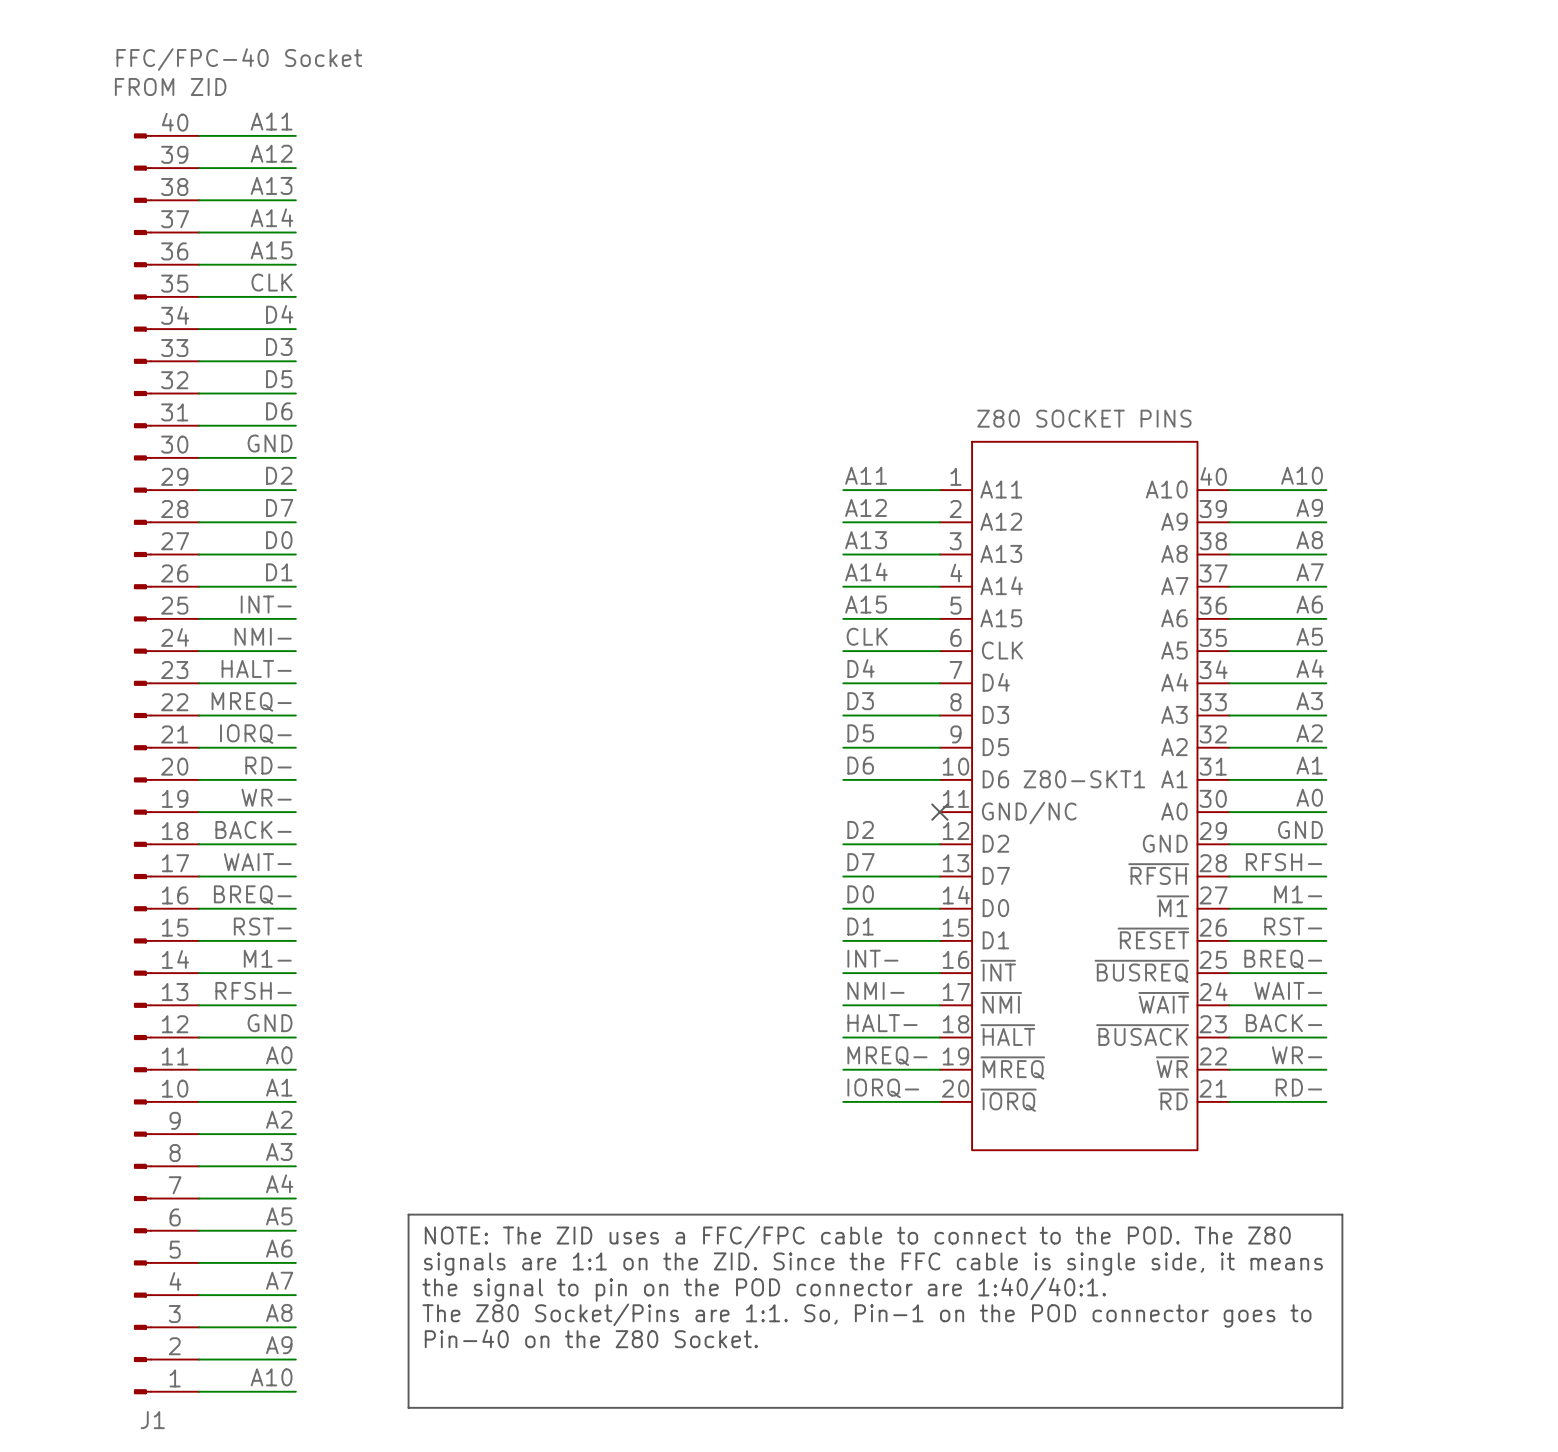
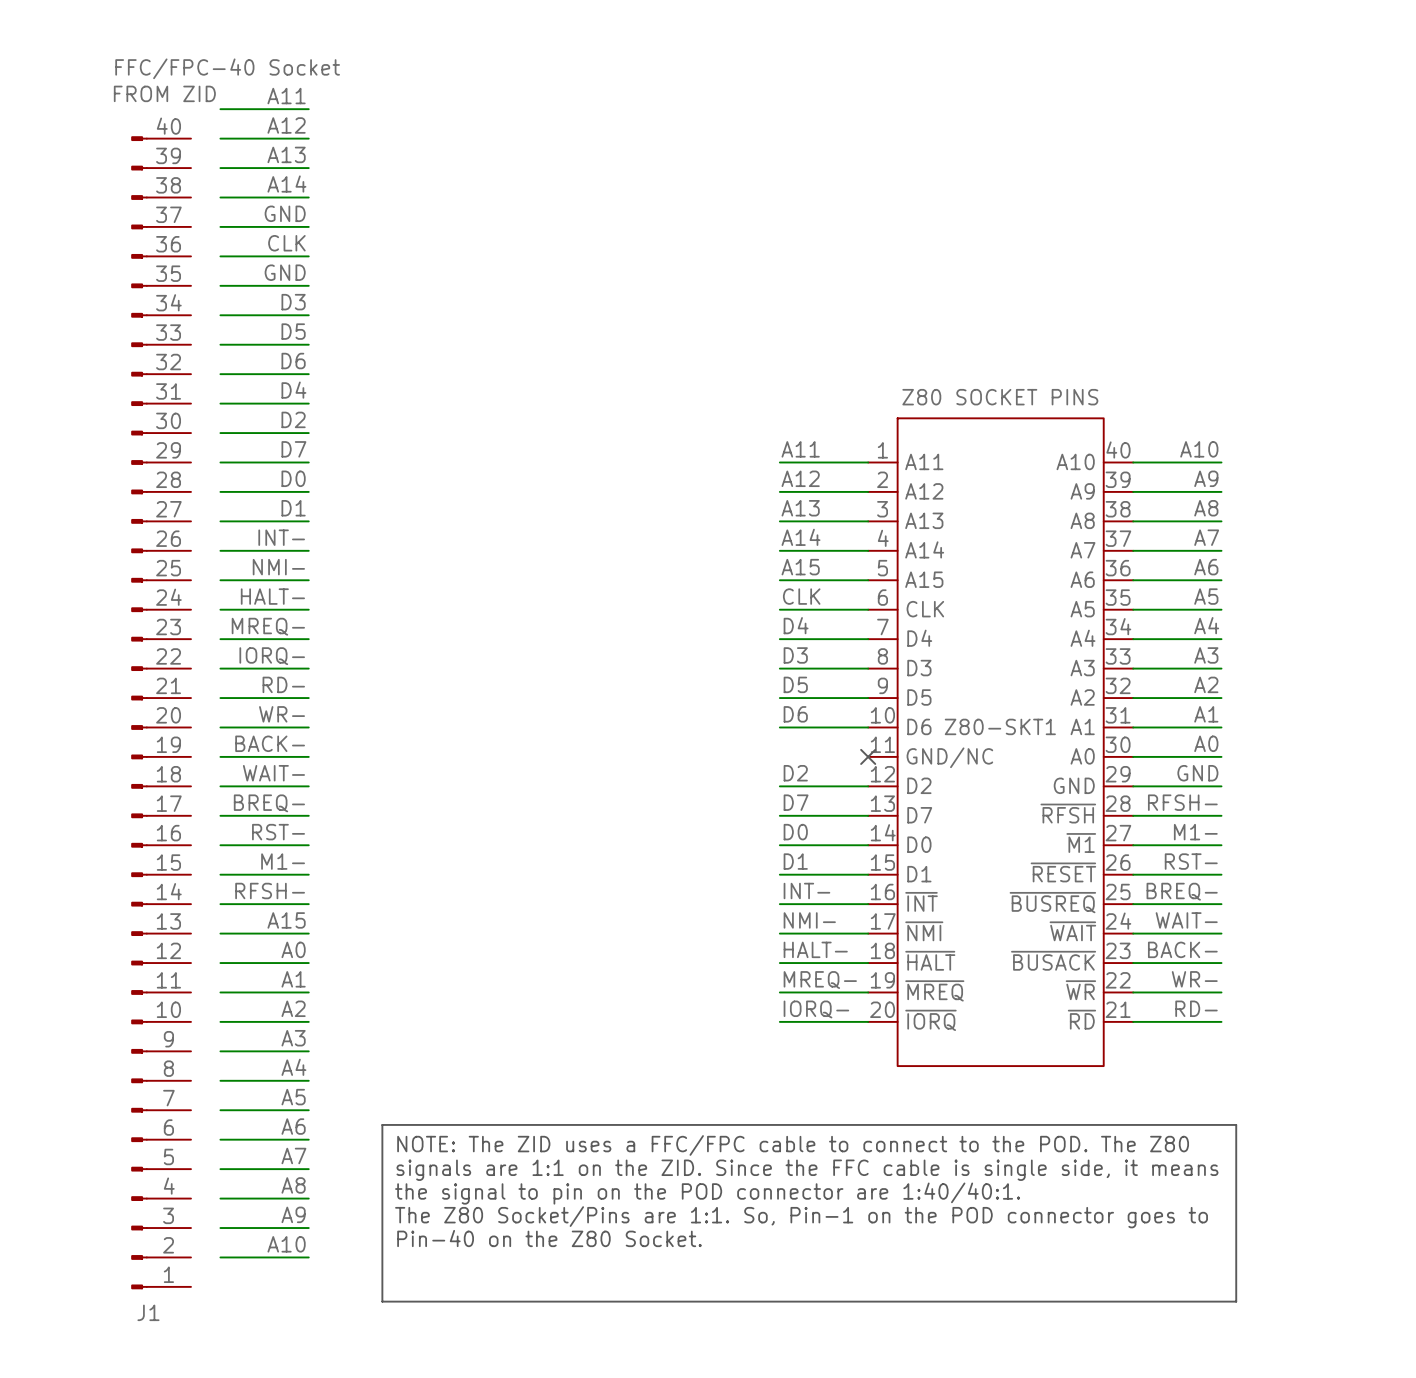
wire: none -> (220, 109) (308, 109)
label position: A11 (271, 121) -> A11 (286, 96)
wire: (199, 135) (231, 135) -> (279, 138) (308, 138)
label position: A12 (271, 153) -> A12 (286, 125)
wire: (199, 168) (231, 168) -> (279, 168) (308, 168)
label position: A13 (271, 185) -> A13 (286, 154)
wire: (199, 200) (231, 200) -> (279, 197) (308, 197)
label position: A14 (271, 217) -> A14 (286, 184)
label: none -> GND (285, 213)
wire: (199, 232) (231, 232) -> (279, 226) (308, 226)
label: A15 (271, 250) -> none
wire: (199, 264) (231, 264) -> (279, 256) (308, 256)
label position: CLK (271, 282) -> CLK (286, 243)
label: none -> GND (285, 272)
wire: (199, 296) (231, 296) -> (279, 285) (308, 285)
label position: D4 (279, 314) -> D4 (293, 390)
wire: (199, 329) (231, 329) -> (279, 315) (308, 315)
label position: D3 (279, 346) -> D3 (293, 302)
wire: (199, 361) (231, 361) -> (279, 344) (308, 344)
label position: D5 (279, 379) -> D5 (293, 331)
wire: (199, 393) (231, 393) -> (279, 374) (308, 374)
label position: D6 (279, 411) -> D6 (293, 361)
wire: (199, 425) (231, 425) -> (279, 403) (308, 403)
label: GND (270, 443) -> none
wire: (199, 457) (231, 457) -> (279, 433) (308, 433)
label position: D2 (279, 475) -> D2 (293, 419)
wire: (199, 490) (231, 490) -> (279, 462) (308, 462)
label position: D7 (279, 507) -> D7 (293, 449)
wire: (199, 522) (231, 522) -> (279, 491) (308, 491)
label position: D0 (279, 540) -> D0 (293, 478)
wire: (199, 554) (231, 554) -> (279, 521) (308, 521)
label position: D1 (279, 572) -> D1 (293, 508)
wire: (199, 586) (231, 586) -> (279, 550) (308, 550)
label position: INT- (266, 604) -> INT- (281, 537)
wire: (199, 618) (231, 618) -> (279, 580) (308, 580)
label position: NMI- (263, 636) -> NMI- (278, 567)
wire: (199, 651) (231, 651) -> (279, 609) (308, 609)
label position: HALT- (256, 668) -> HALT- (272, 596)
wire: (199, 683) (231, 683) -> (279, 639) (308, 639)
label position: MREQ- (251, 701) -> MREQ- (268, 626)
wire: (199, 715) (231, 715) -> (279, 668) (308, 668)
label position: IORQ- (255, 734) -> IORQ- (272, 656)
wire: (199, 747) (231, 747) -> (279, 698) (308, 698)
label position: RD- (268, 765) -> RD- (283, 684)
wire: (199, 779) (231, 779) -> (279, 727) (308, 727)
label position: WR- (266, 797) -> WR- (282, 714)
wire: (199, 812) (231, 812) -> (279, 756) (308, 756)
label position: BACK- (253, 829) -> BACK- (270, 743)
wire: (199, 844) (231, 844) -> (279, 786) (308, 786)
label position: WAIT- (257, 862) -> WAIT- (273, 773)
wire: (199, 876) (231, 876) -> (279, 815) (308, 815)
label position: BREQ- (252, 895) -> BREQ- (269, 803)
wire: (199, 908) (231, 908) -> (279, 845) (308, 845)
label position: RST- (262, 926) -> RST- (278, 832)
wire: (199, 940) (231, 940) -> (279, 874) (308, 874)
label position: M1- (267, 958) -> M1- (283, 861)
wire: (199, 973) (231, 973) -> (279, 904) (308, 904)
label position: RFSH- (253, 990) -> RFSH- (270, 891)
label: none -> A15 (286, 920)
wire: (199, 1005) (231, 1005) -> (279, 933) (308, 933)
label: GND (270, 1023) -> none
wire: (199, 1037) (231, 1037) -> (279, 963) (308, 963)
label position: A0 (279, 1055) -> A0 (293, 949)
wire: (199, 1069) (231, 1069) -> (279, 992) (308, 992)
label position: A1 (279, 1087) -> A1 (293, 979)
wire: (199, 1101) (231, 1101) -> (279, 1021) (308, 1021)
label position: A2 (279, 1119) -> A2 (293, 1008)
wire: (199, 1134) (231, 1134) -> (279, 1051) (308, 1051)
label position: A3 (279, 1151) -> A3 (293, 1038)
wire: (199, 1166) (231, 1166) -> (279, 1080) (308, 1080)
label position: A4 (279, 1183) -> A4 (293, 1067)
wire: (199, 1198) (231, 1198) -> (279, 1110) (308, 1110)
label position: A5 (279, 1216) -> A5 (293, 1097)
wire: (199, 1230) (231, 1230) -> (279, 1139) (308, 1139)
label position: A6 (279, 1248) -> A6 (293, 1126)
wire: (199, 1262) (231, 1262) -> (279, 1169) (308, 1169)
label position: A7 (279, 1280) -> A7 (293, 1155)
wire: (199, 1295) (231, 1295) -> (279, 1198) (308, 1198)
label position: A8 (279, 1312) -> A8 (293, 1185)
wire: (199, 1327) (231, 1327) -> (279, 1228) (308, 1228)
label position: A9 (279, 1345) -> A9 (293, 1214)
wire: (199, 1359) (231, 1359) -> (279, 1257) (308, 1257)
label position: A10 (271, 1377) -> A10 (286, 1244)
wire: (199, 1391) (295, 1391) -> none

